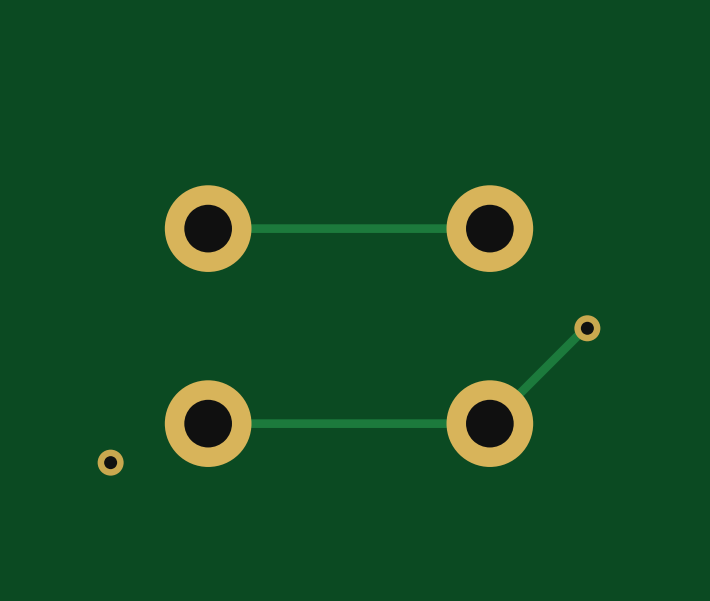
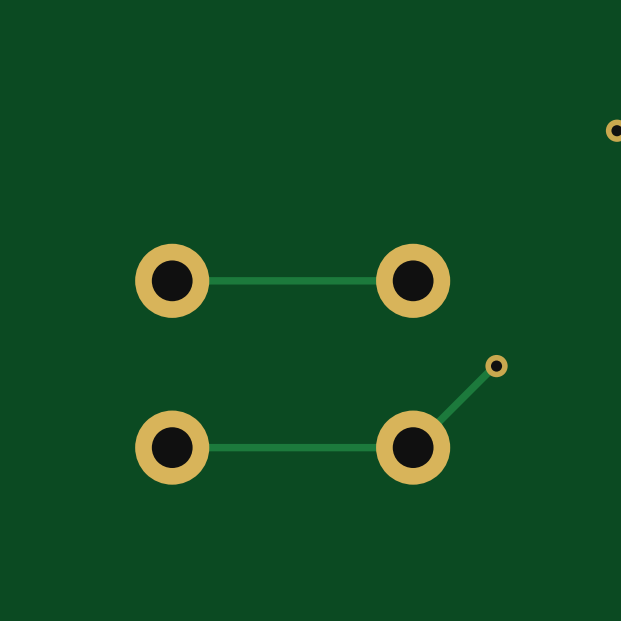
via: (110, 462) -> none

